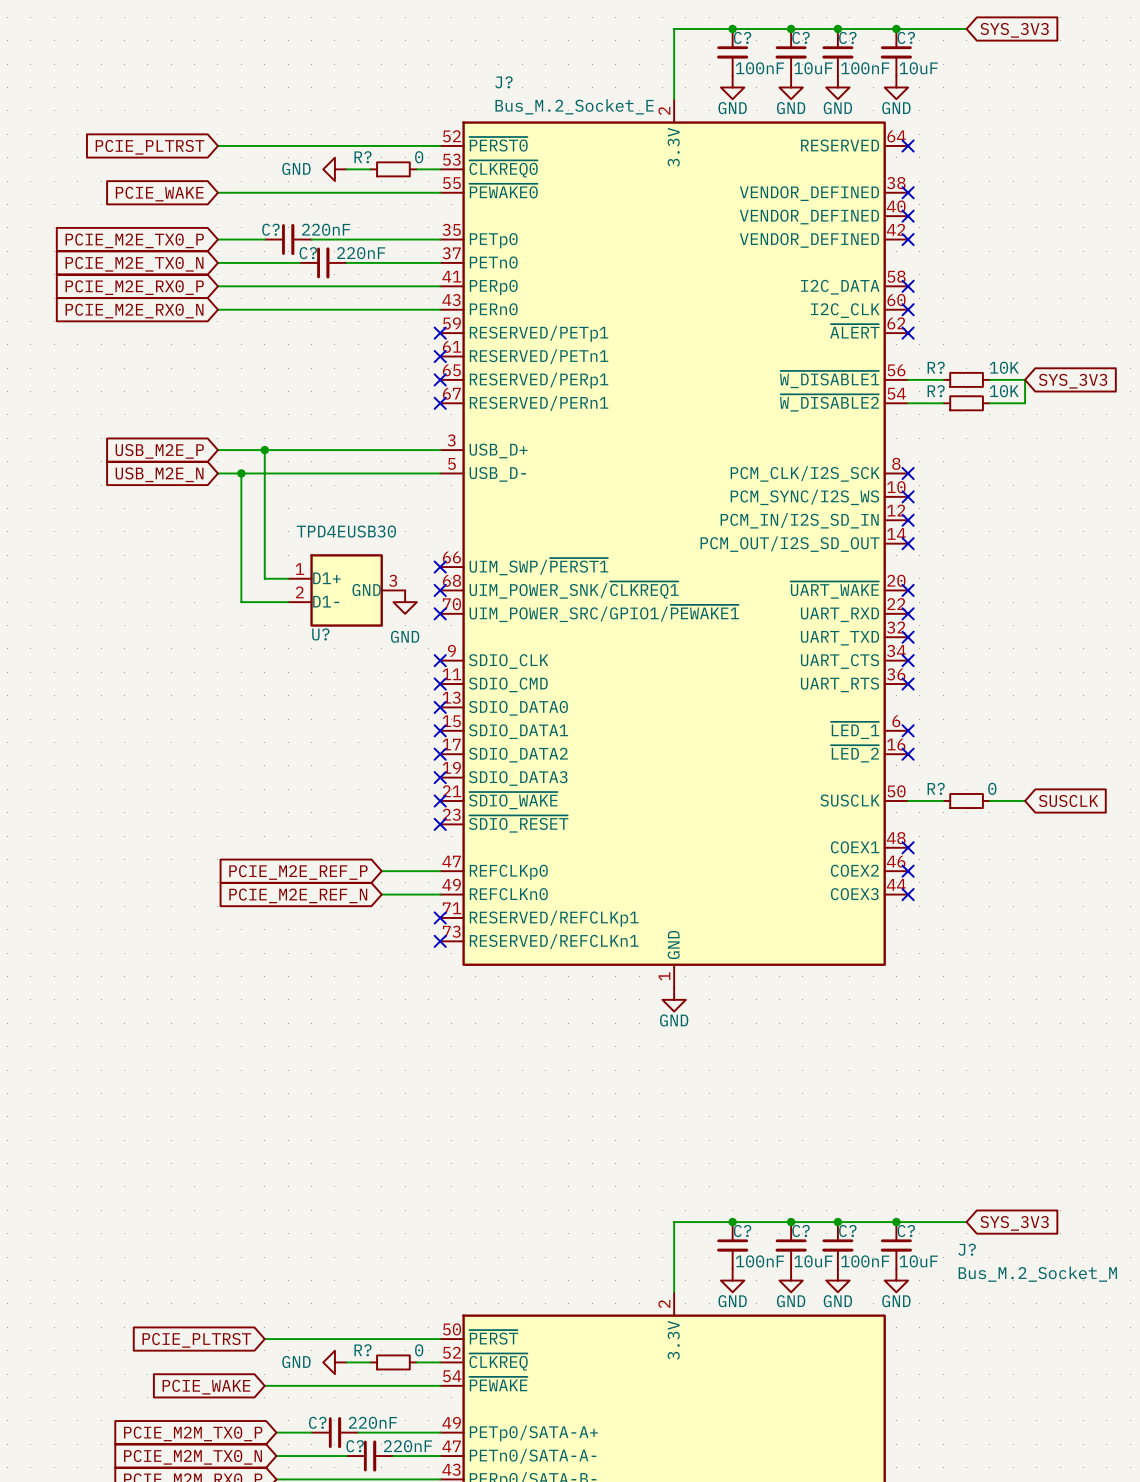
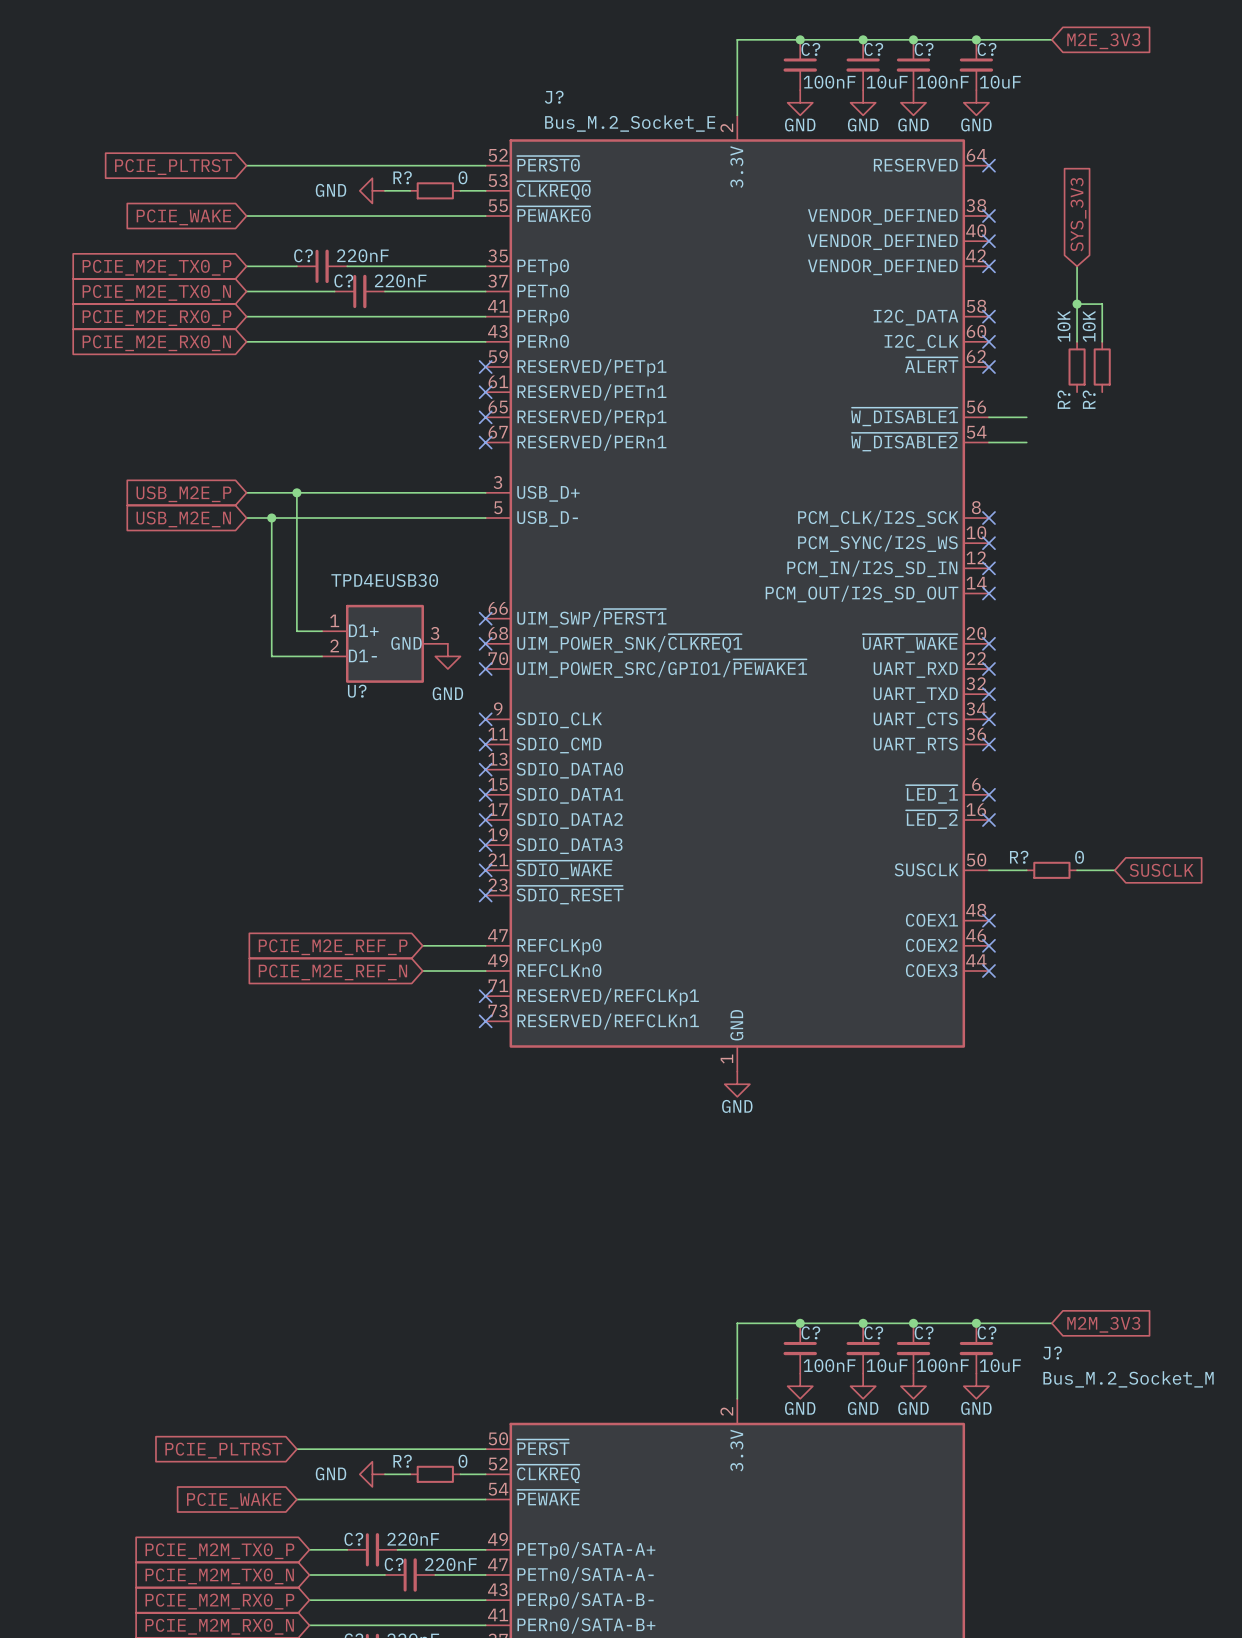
global label: SYS_3V3 (1014, 30) -> M2E_3V3 (1103, 41)
wire: none -> (1077, 266) (1077, 341)
wire: none -> (1077, 304) (1102, 304) (1102, 341)
junction: none -> (1077, 304)
R?: none -> 10K (1077, 367)
R?: none -> 10K (1102, 367)
R?: 10K (966, 379) -> none
wire: (989, 379) (1025, 379) (1025, 403) (989, 403) -> none
global label rotation: 0° (1073, 381) -> 90° counterclockwise (1078, 214)
global label position: SYS_3V3 (1073, 381) -> SYS_3V3 (1078, 214)
R?: 10K (966, 403) -> none
global label: SYS_3V3 (1014, 1223) -> M2M_3V3 (1103, 1324)

